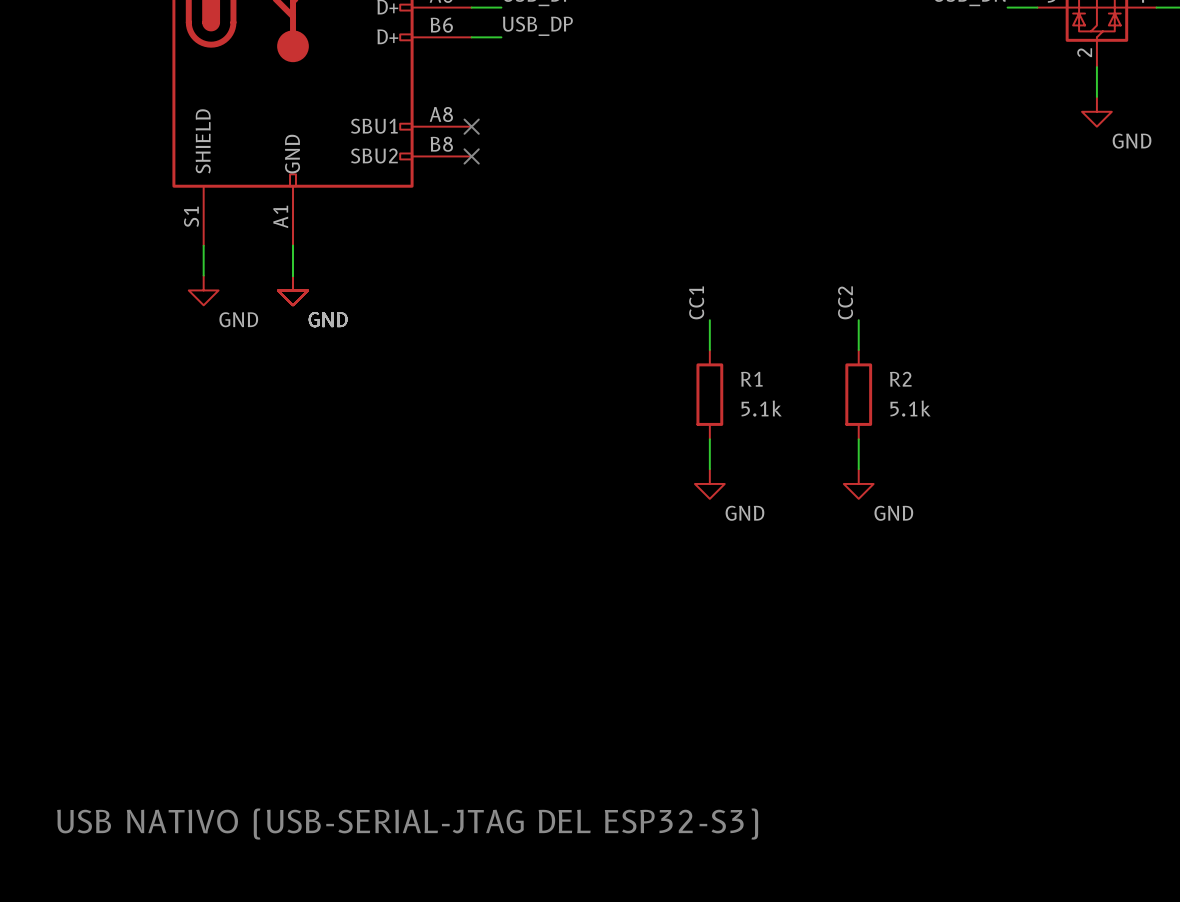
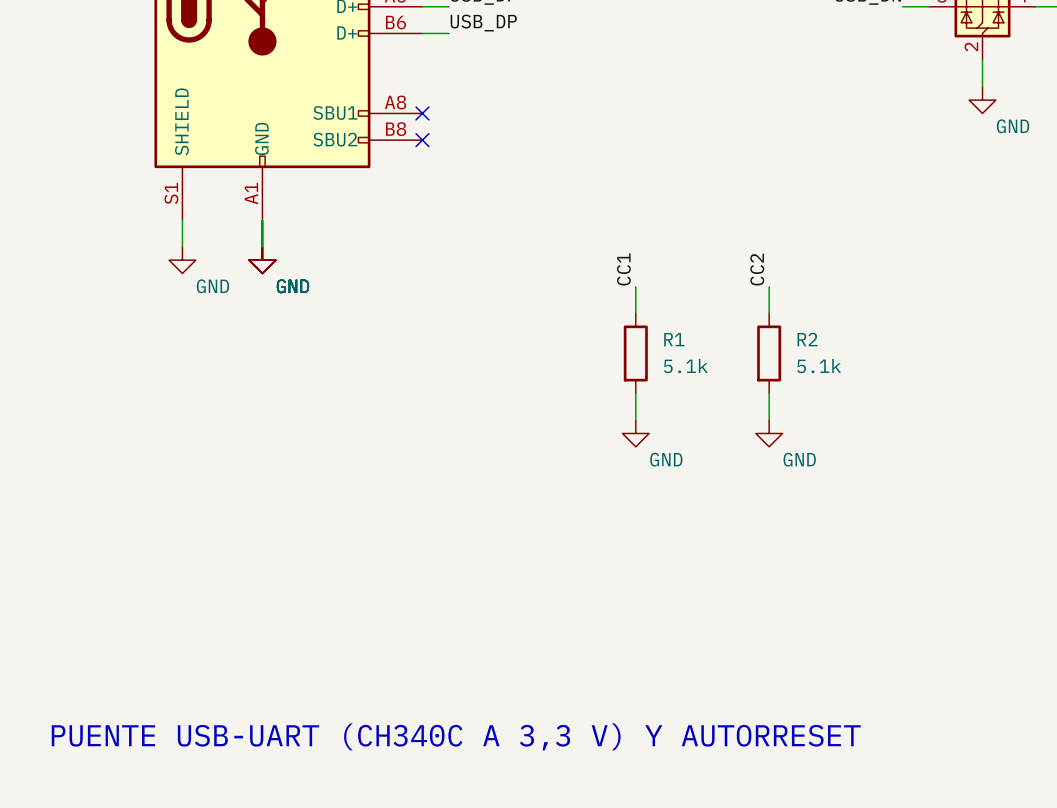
text: USB NATIVO (USB-SERIAL-JTAG DEL ESP32-S3) (407, 824) -> PUENTE USB-UART (CH340C A 3,3 V) Y AUTORRESET (456, 736)

